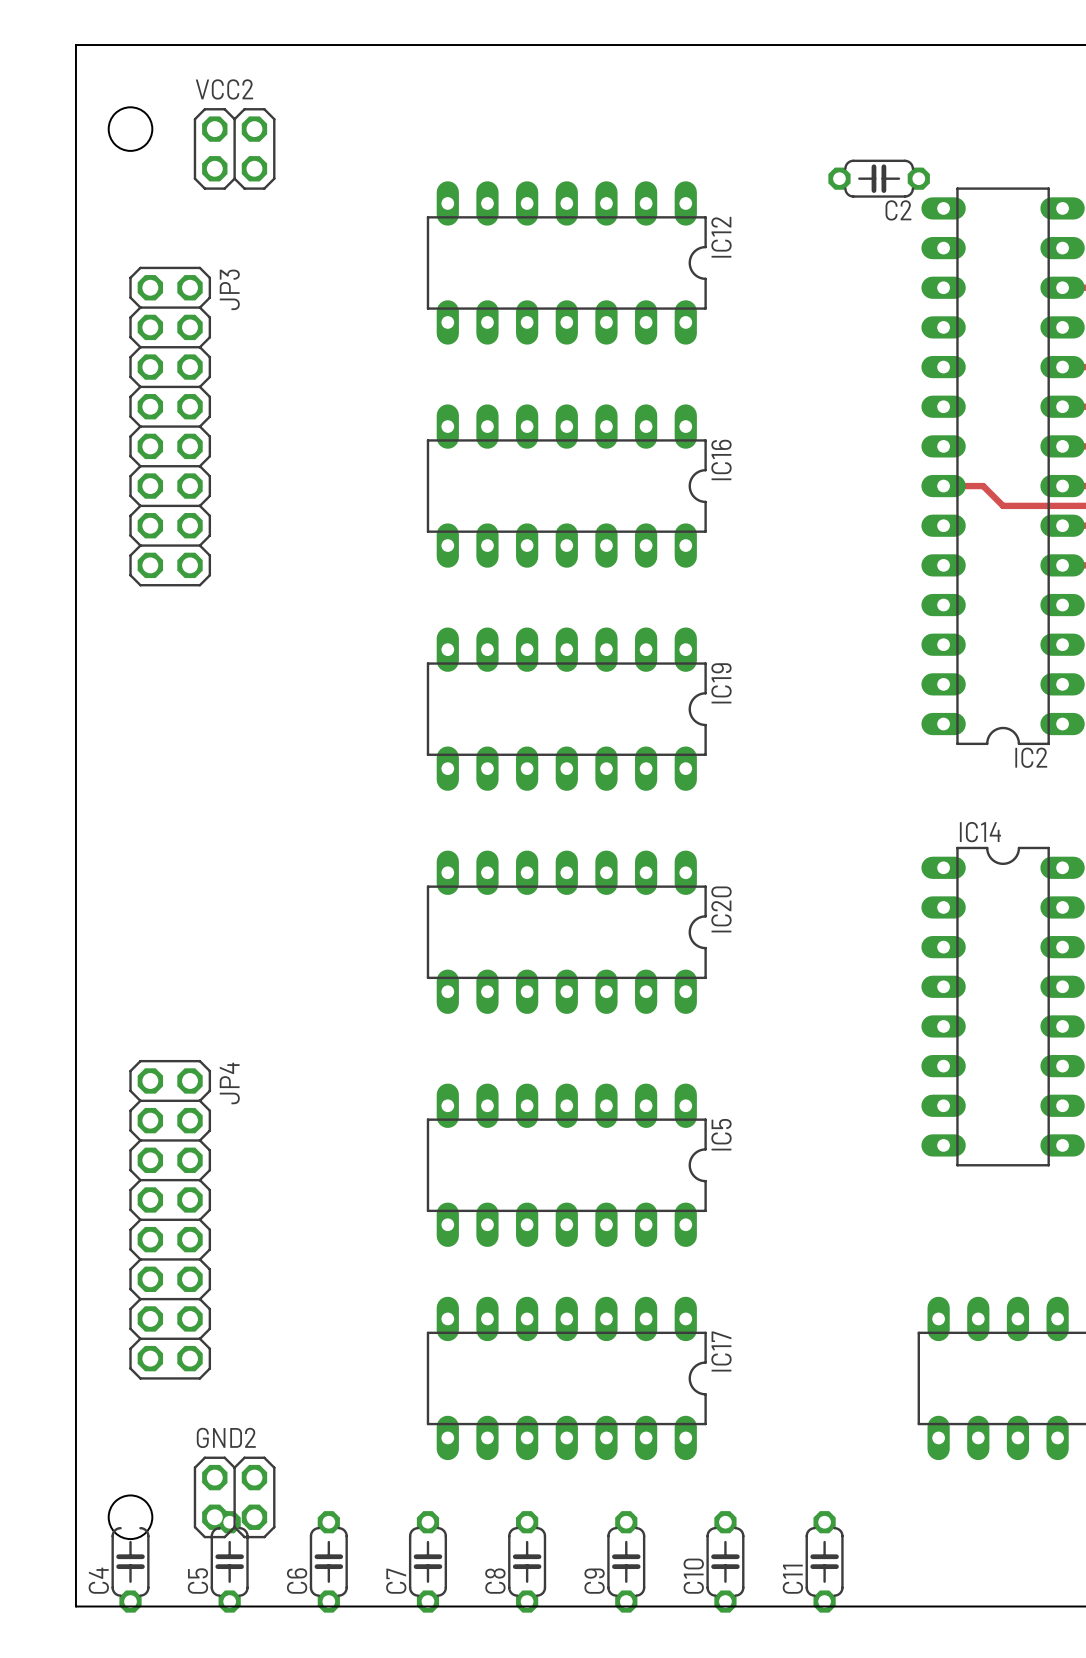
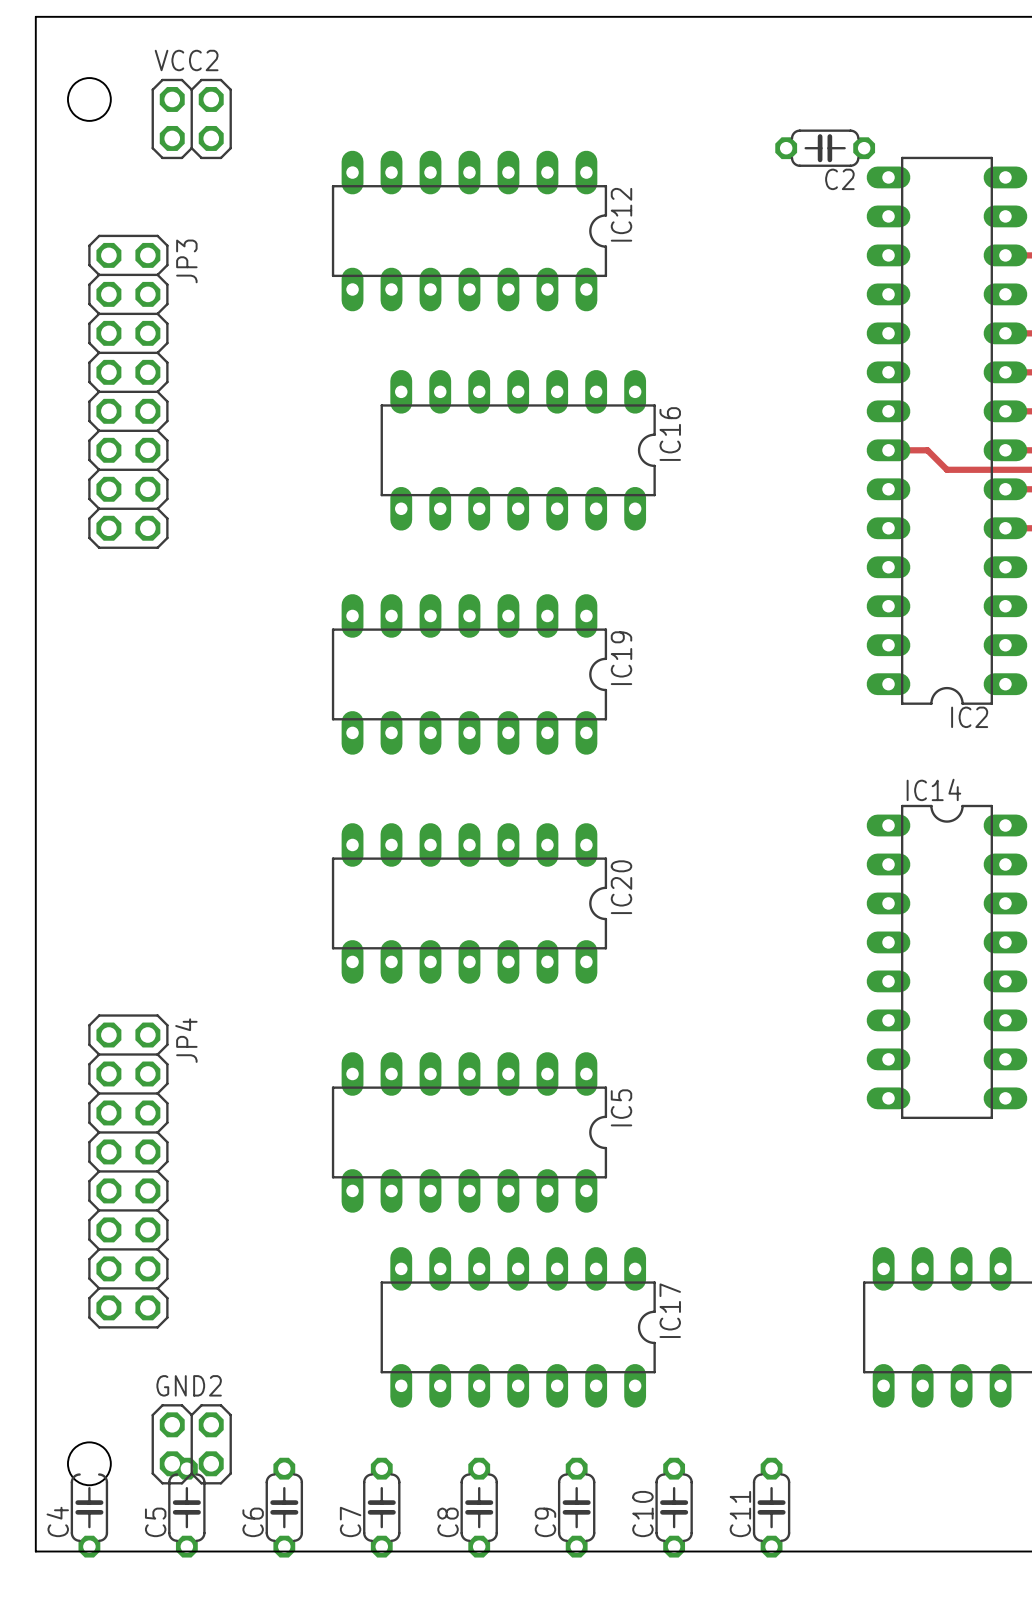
IC12 position: (566, 262) -> (469, 231)
IC19 position: (566, 709) -> (469, 674)
IC20 position: (566, 932) -> (469, 903)
IC5 footprint: [426, 1083, 707, 1247] -> [331, 1052, 608, 1213]

